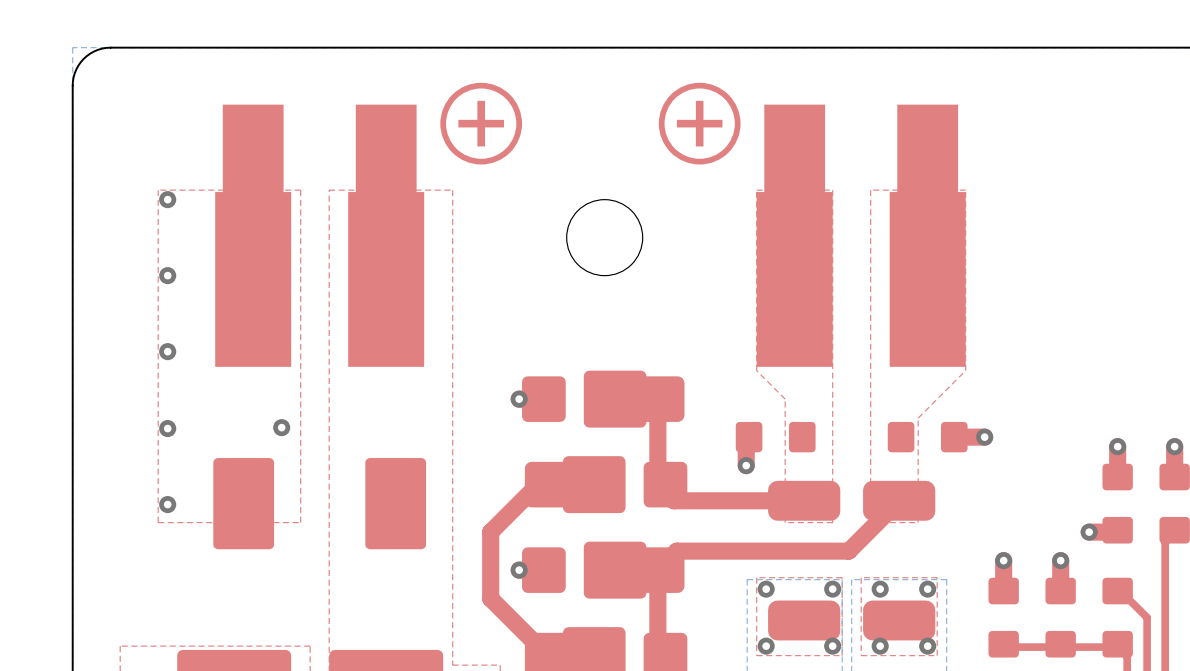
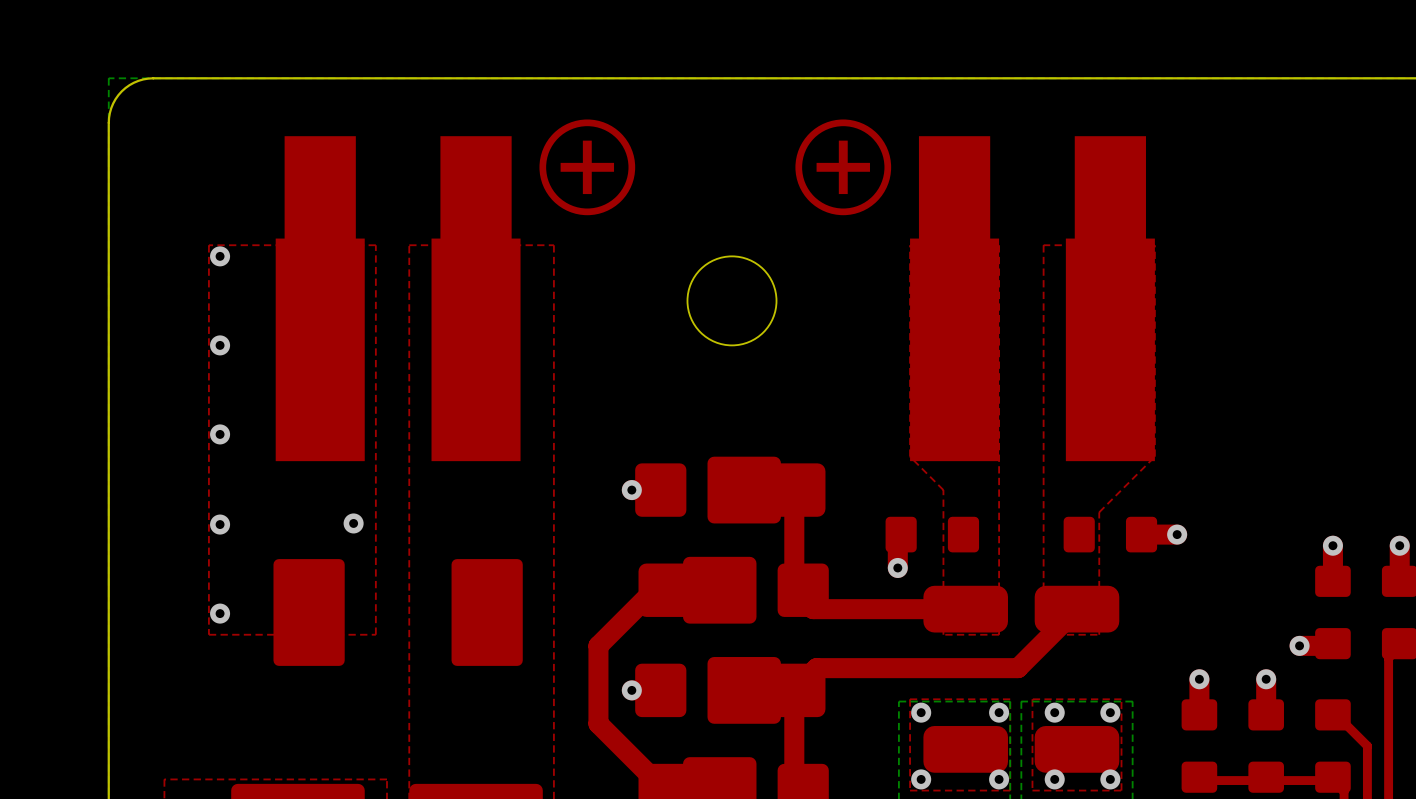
part footprint: [215, 104, 292, 367] -> [275, 136, 365, 462]
part footprint: [348, 104, 425, 367] -> [431, 136, 521, 462]
part footprint: [756, 104, 833, 367] -> [910, 136, 1000, 462]
part footprint: [889, 104, 966, 367] -> [1065, 136, 1155, 462]

